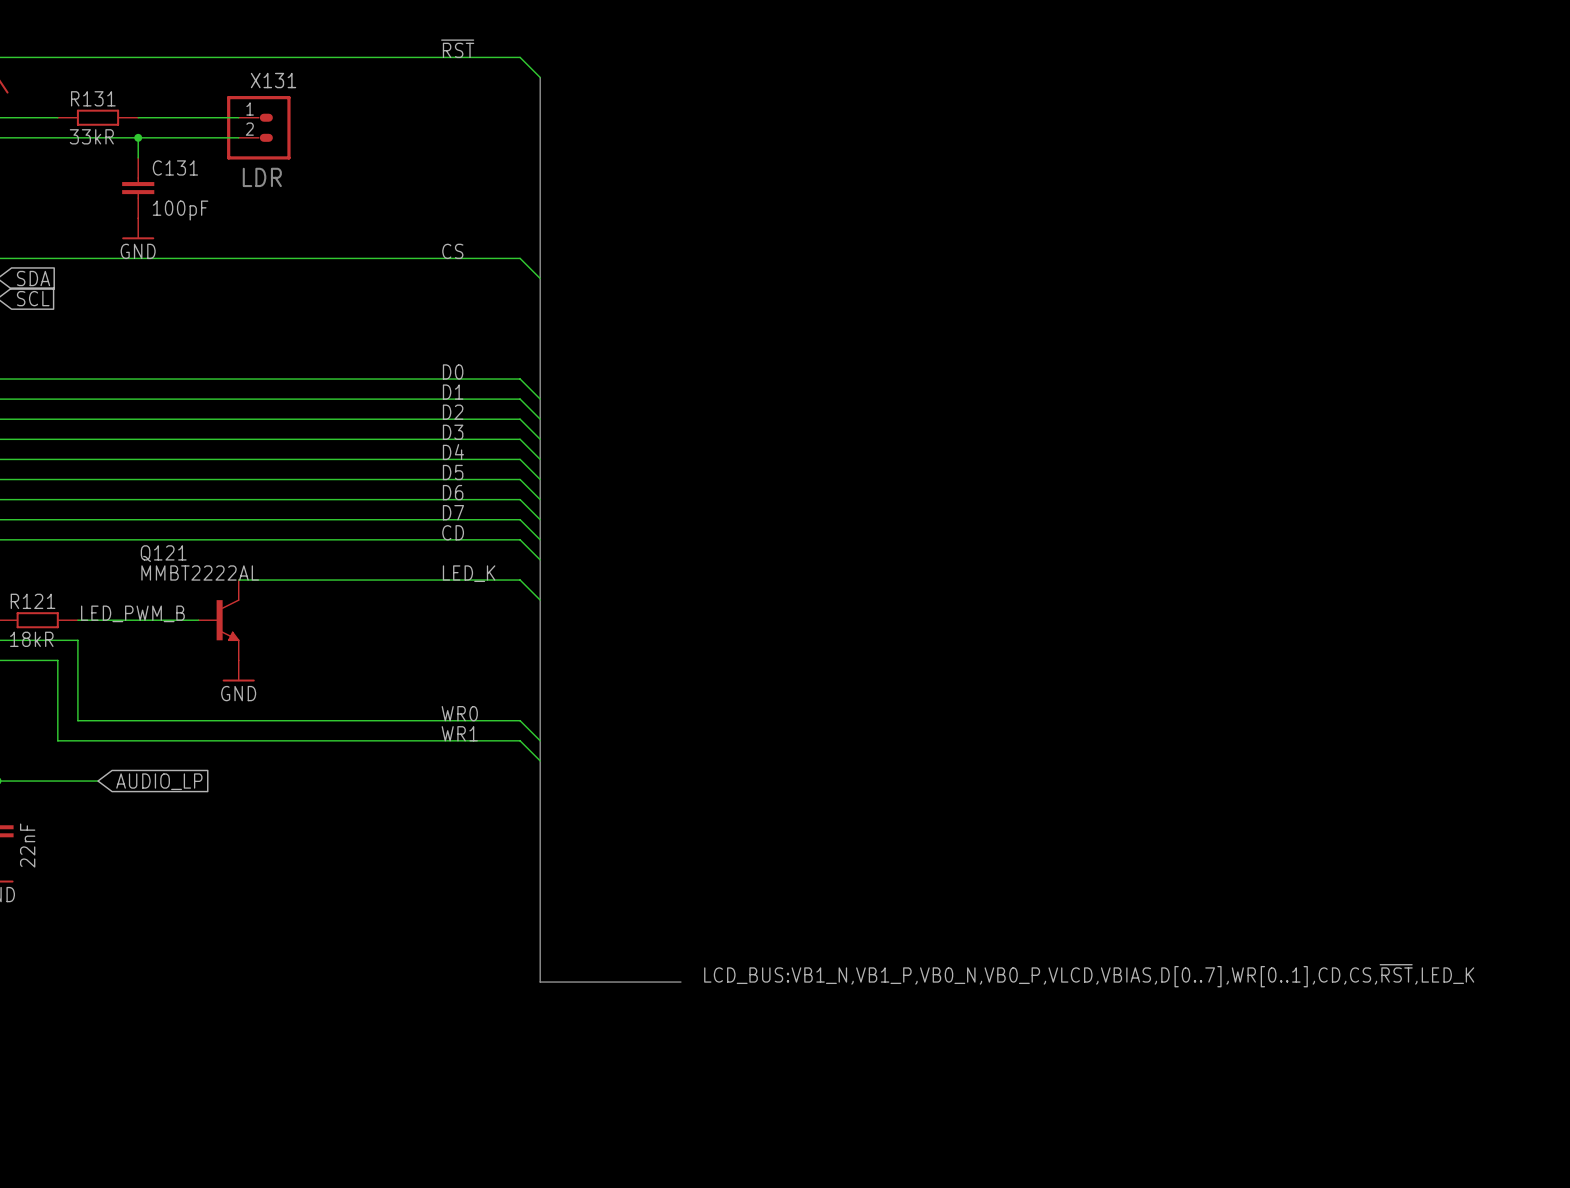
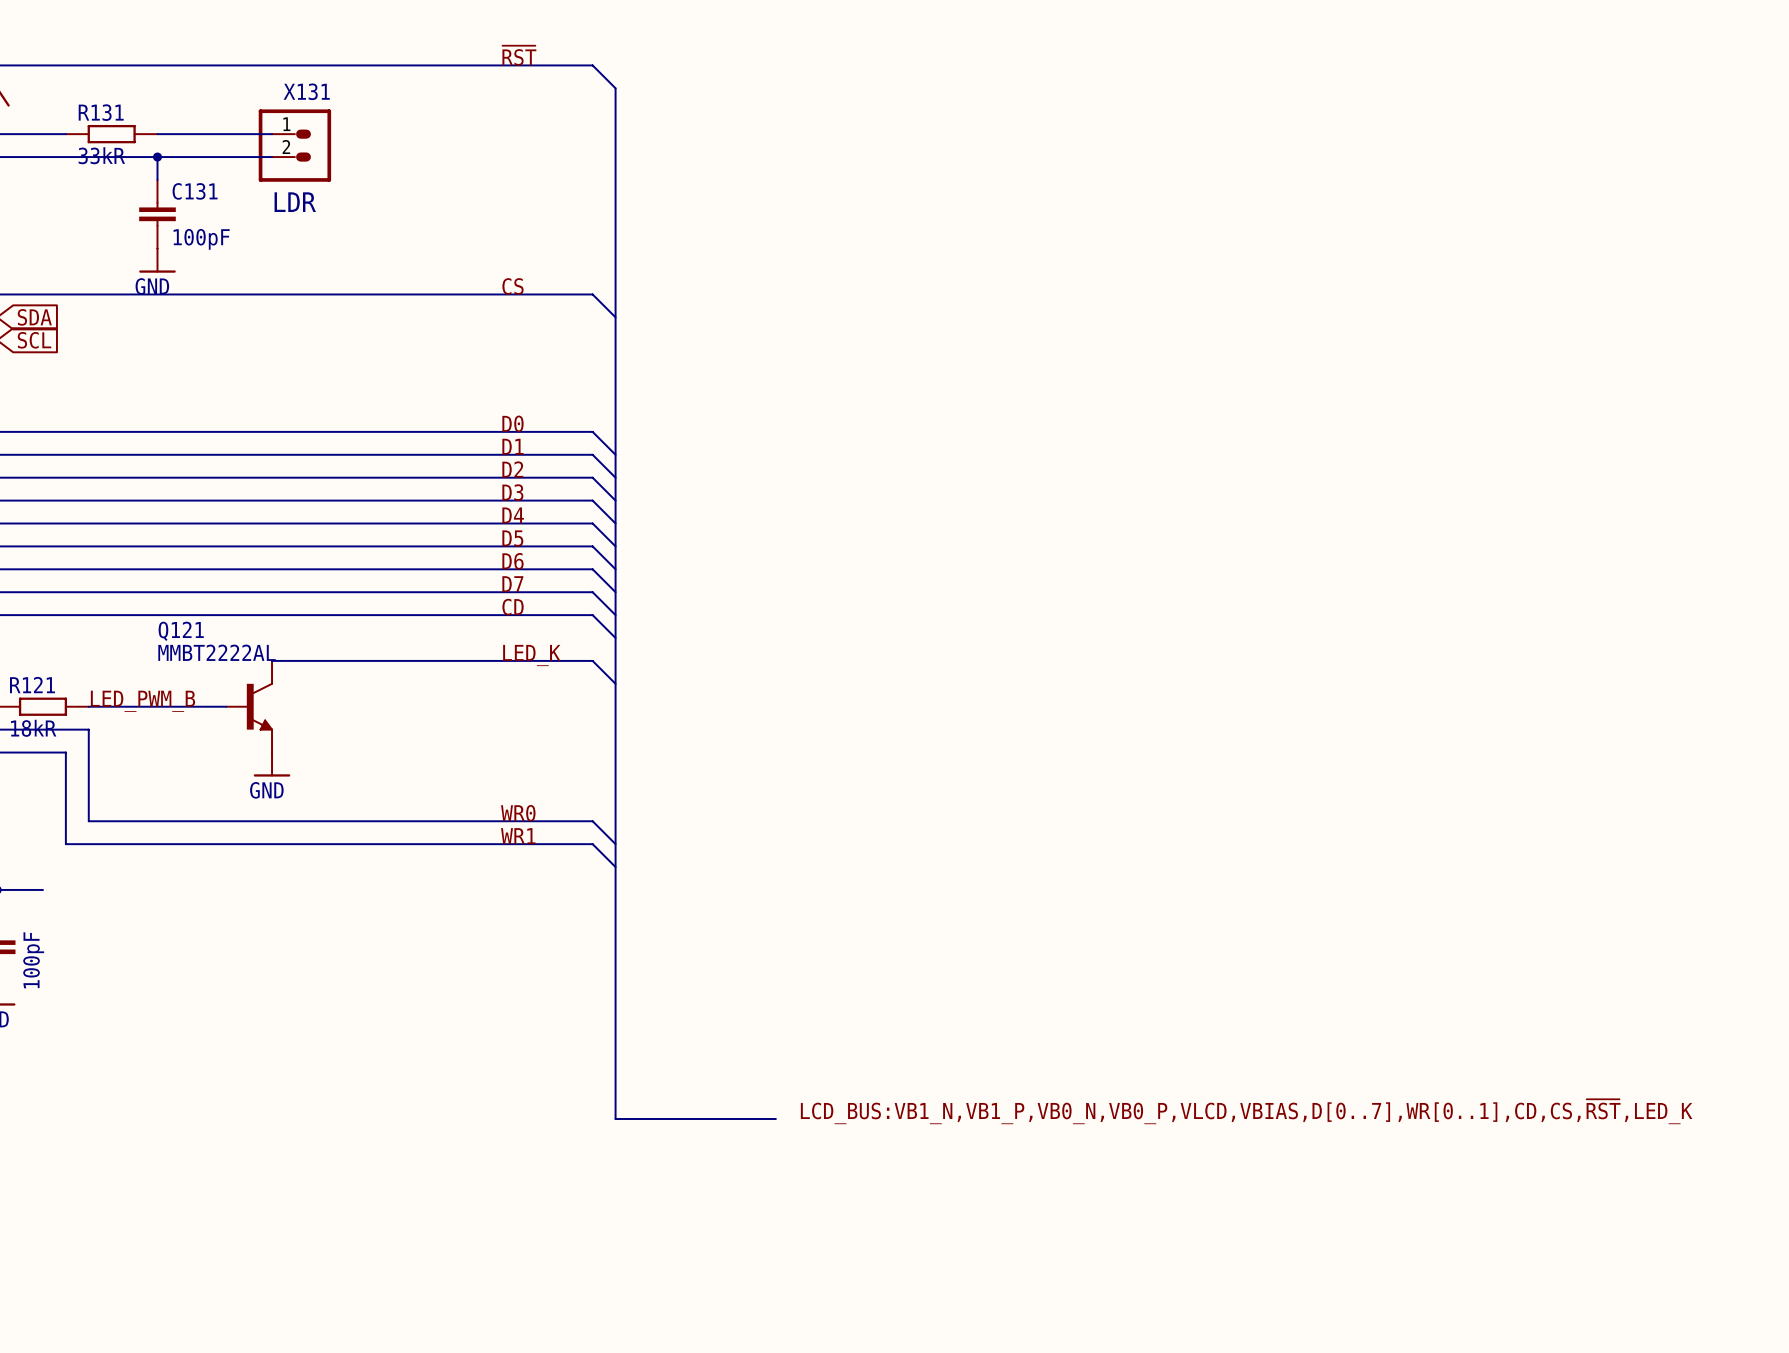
wire: (37, 781) (98, 781) -> none
global label: AUDIO_LP (159, 781) -> none
part value: 22nF (27, 845) -> 100pF (33, 960)

